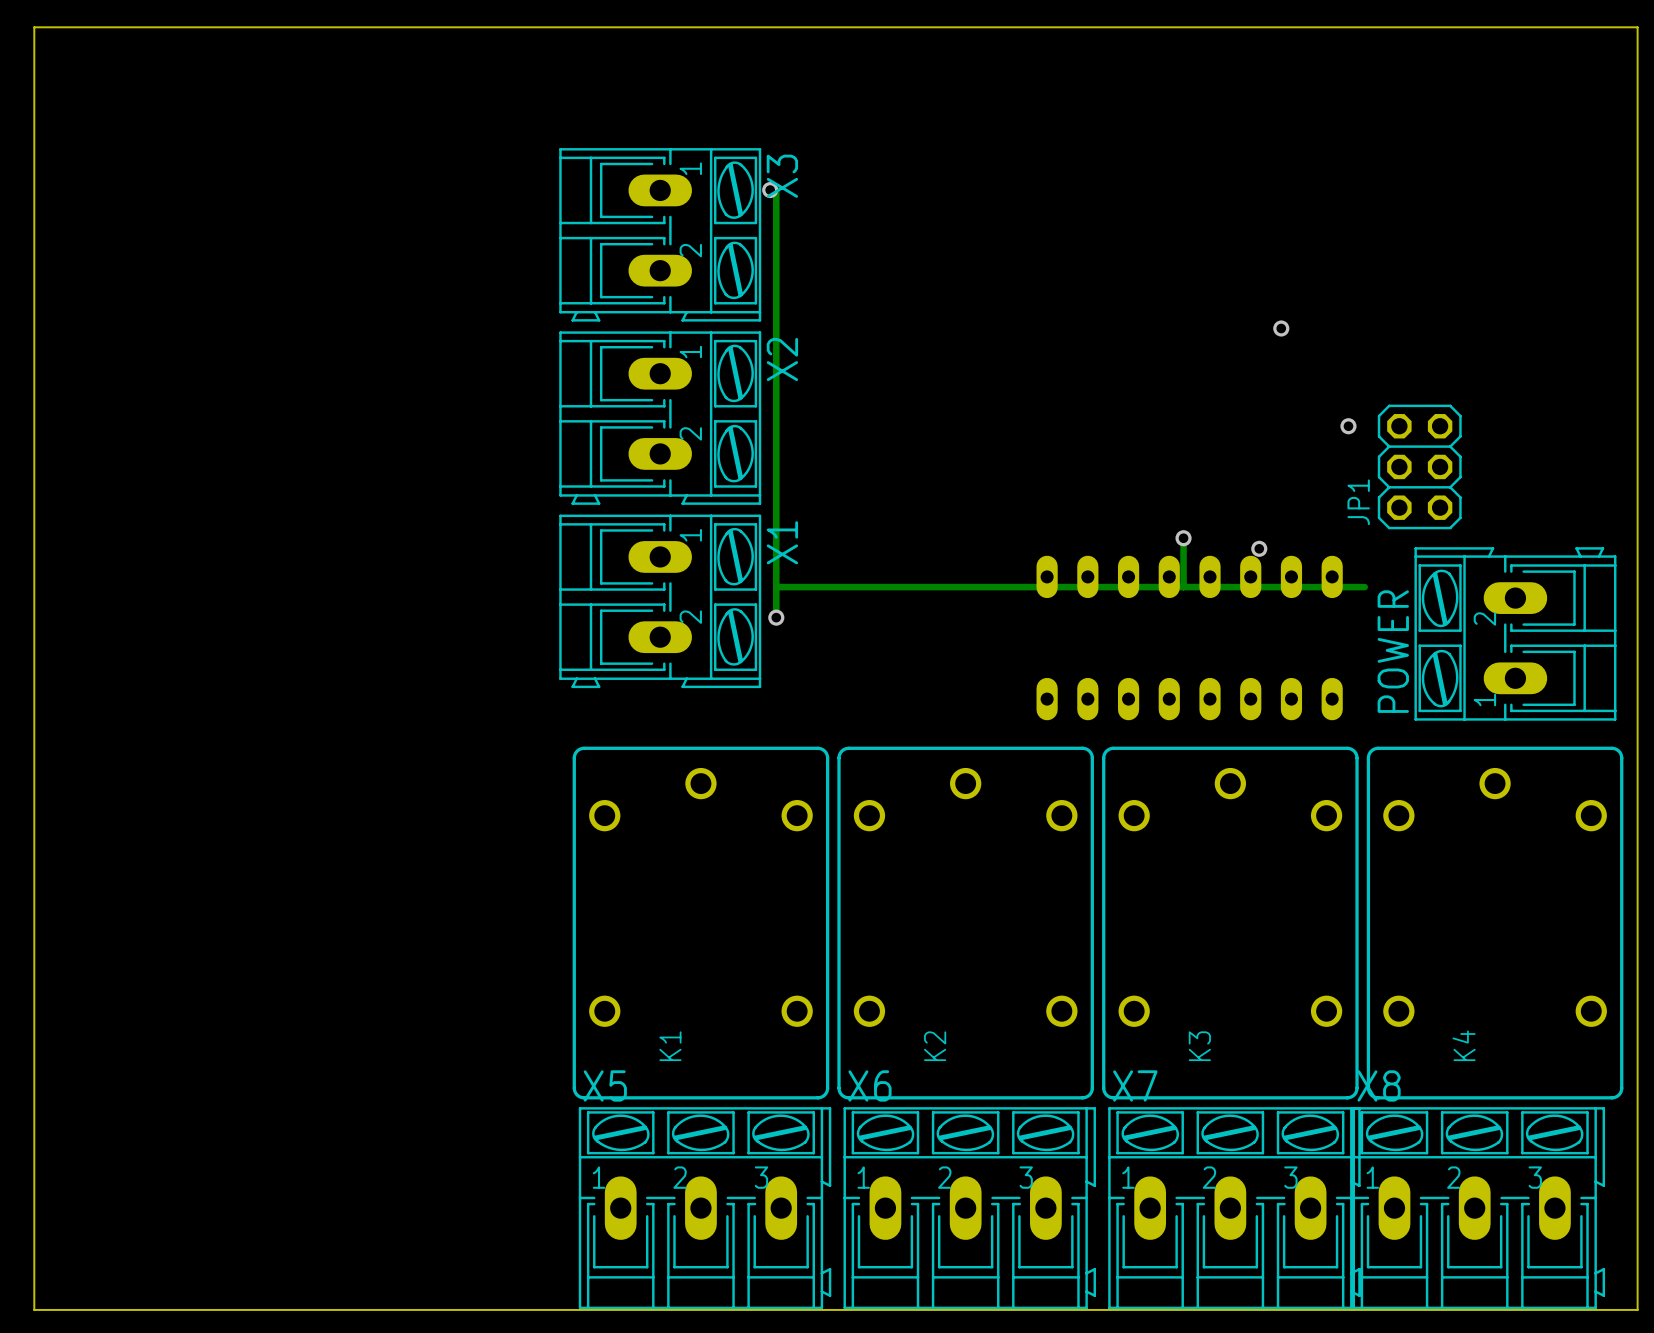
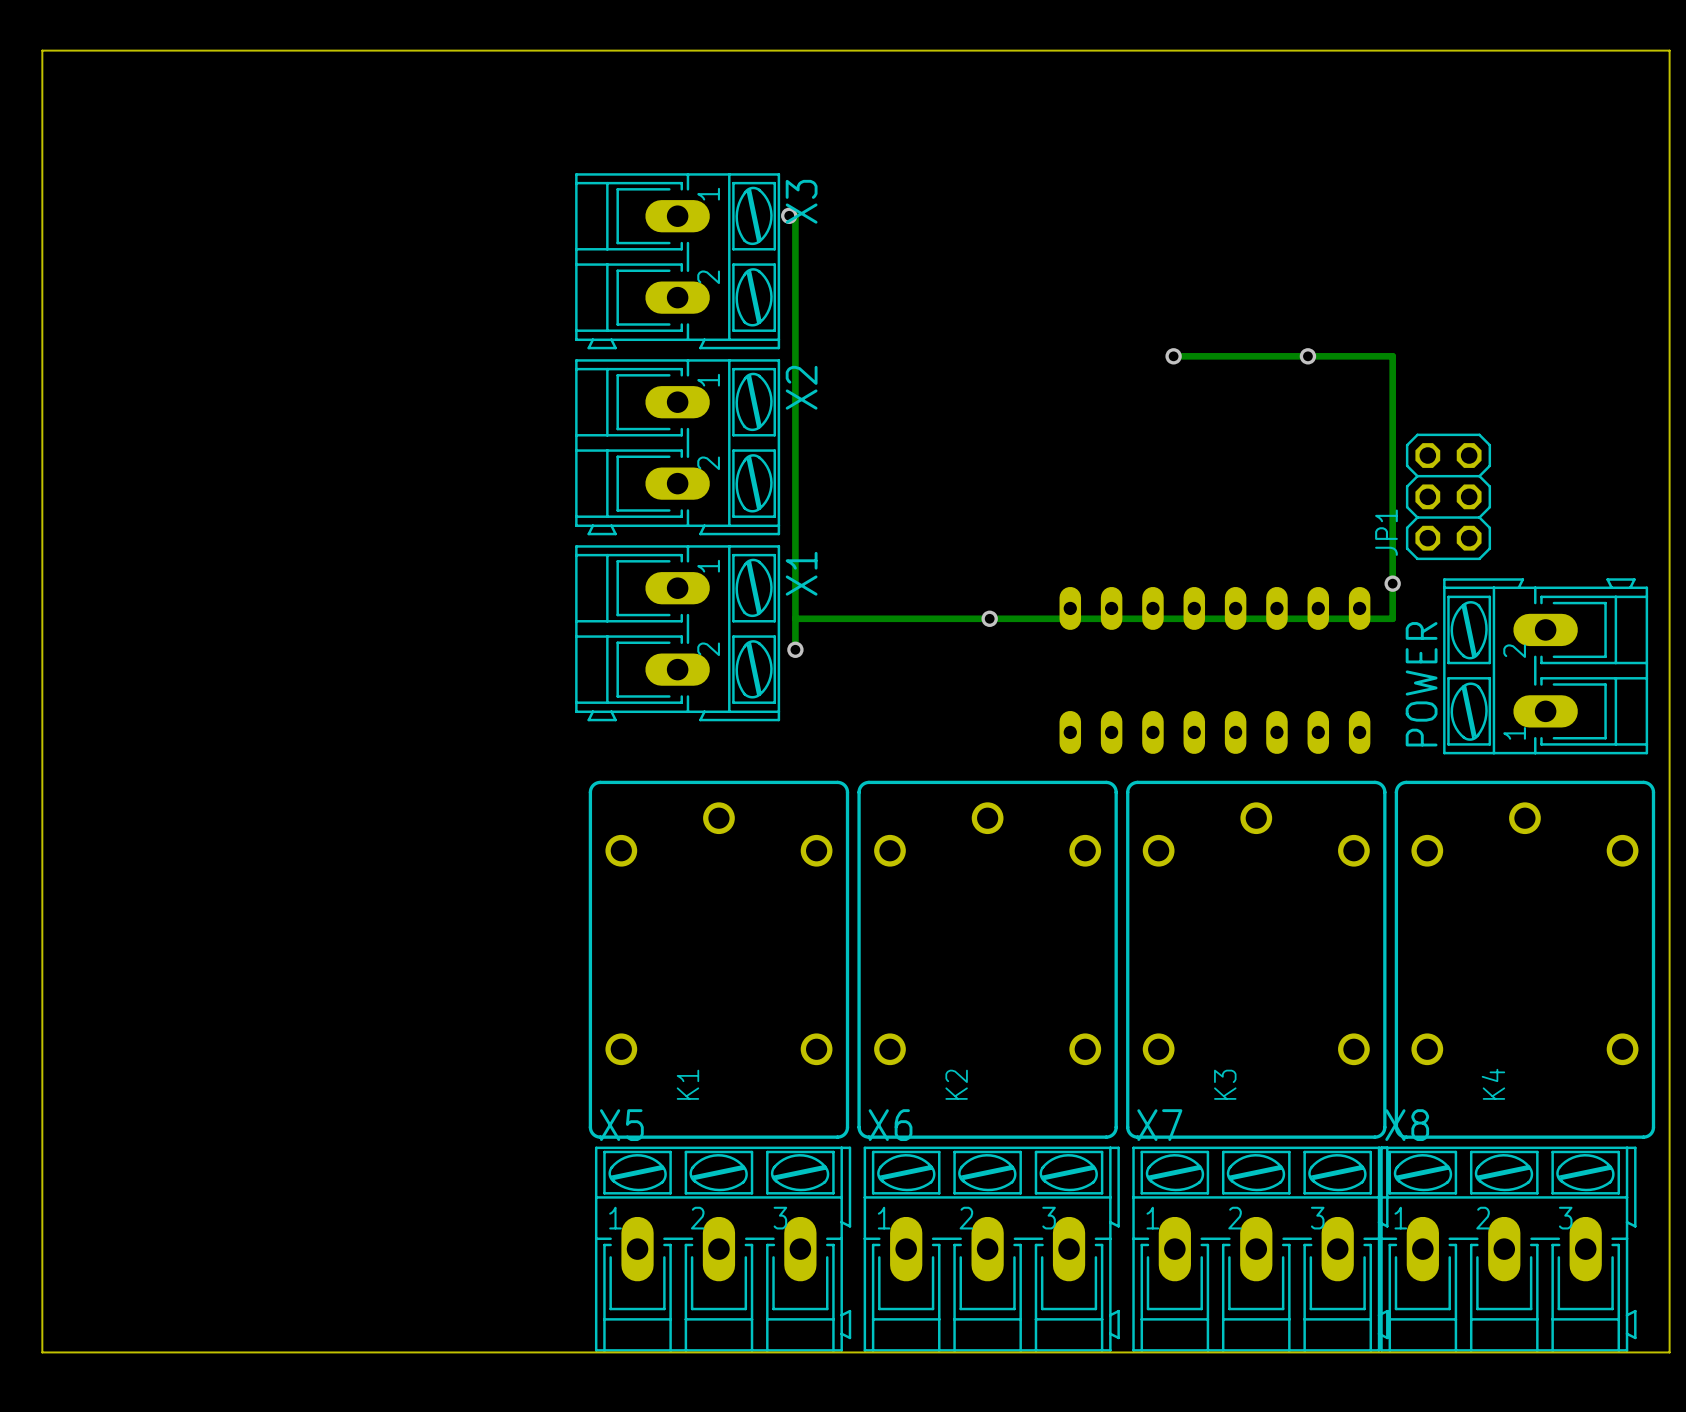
track: none -> (1173, 356) (1392, 356) (1392, 618)
via: none -> (1173, 356)
via: (1348, 426) -> none
track: (1183, 538) (1183, 587) -> none
via: (1183, 538) -> none
via: (1259, 548) -> none
via: none -> (1392, 583)
via: none -> (989, 618)

